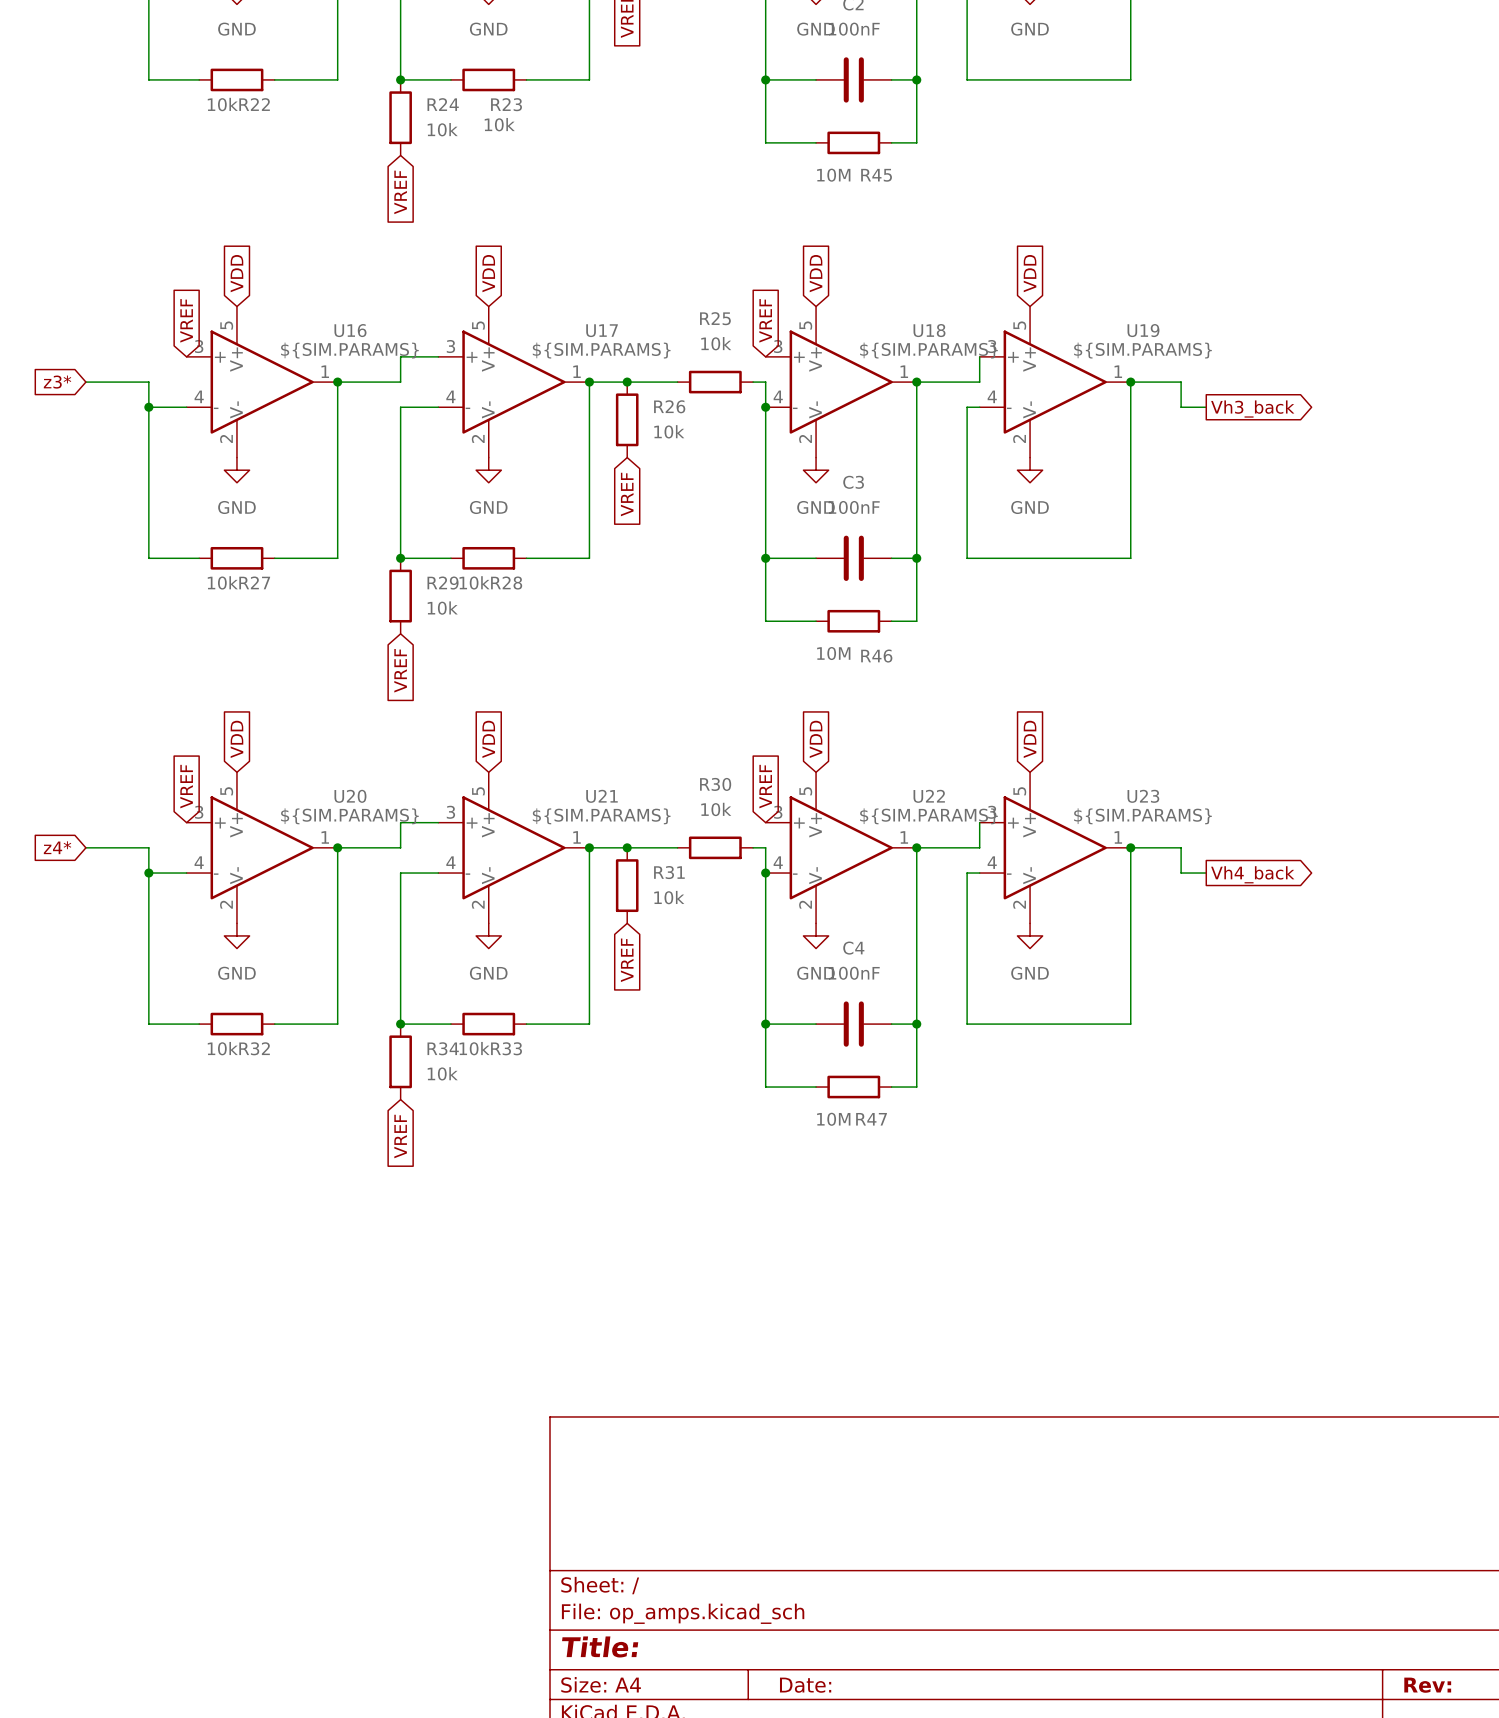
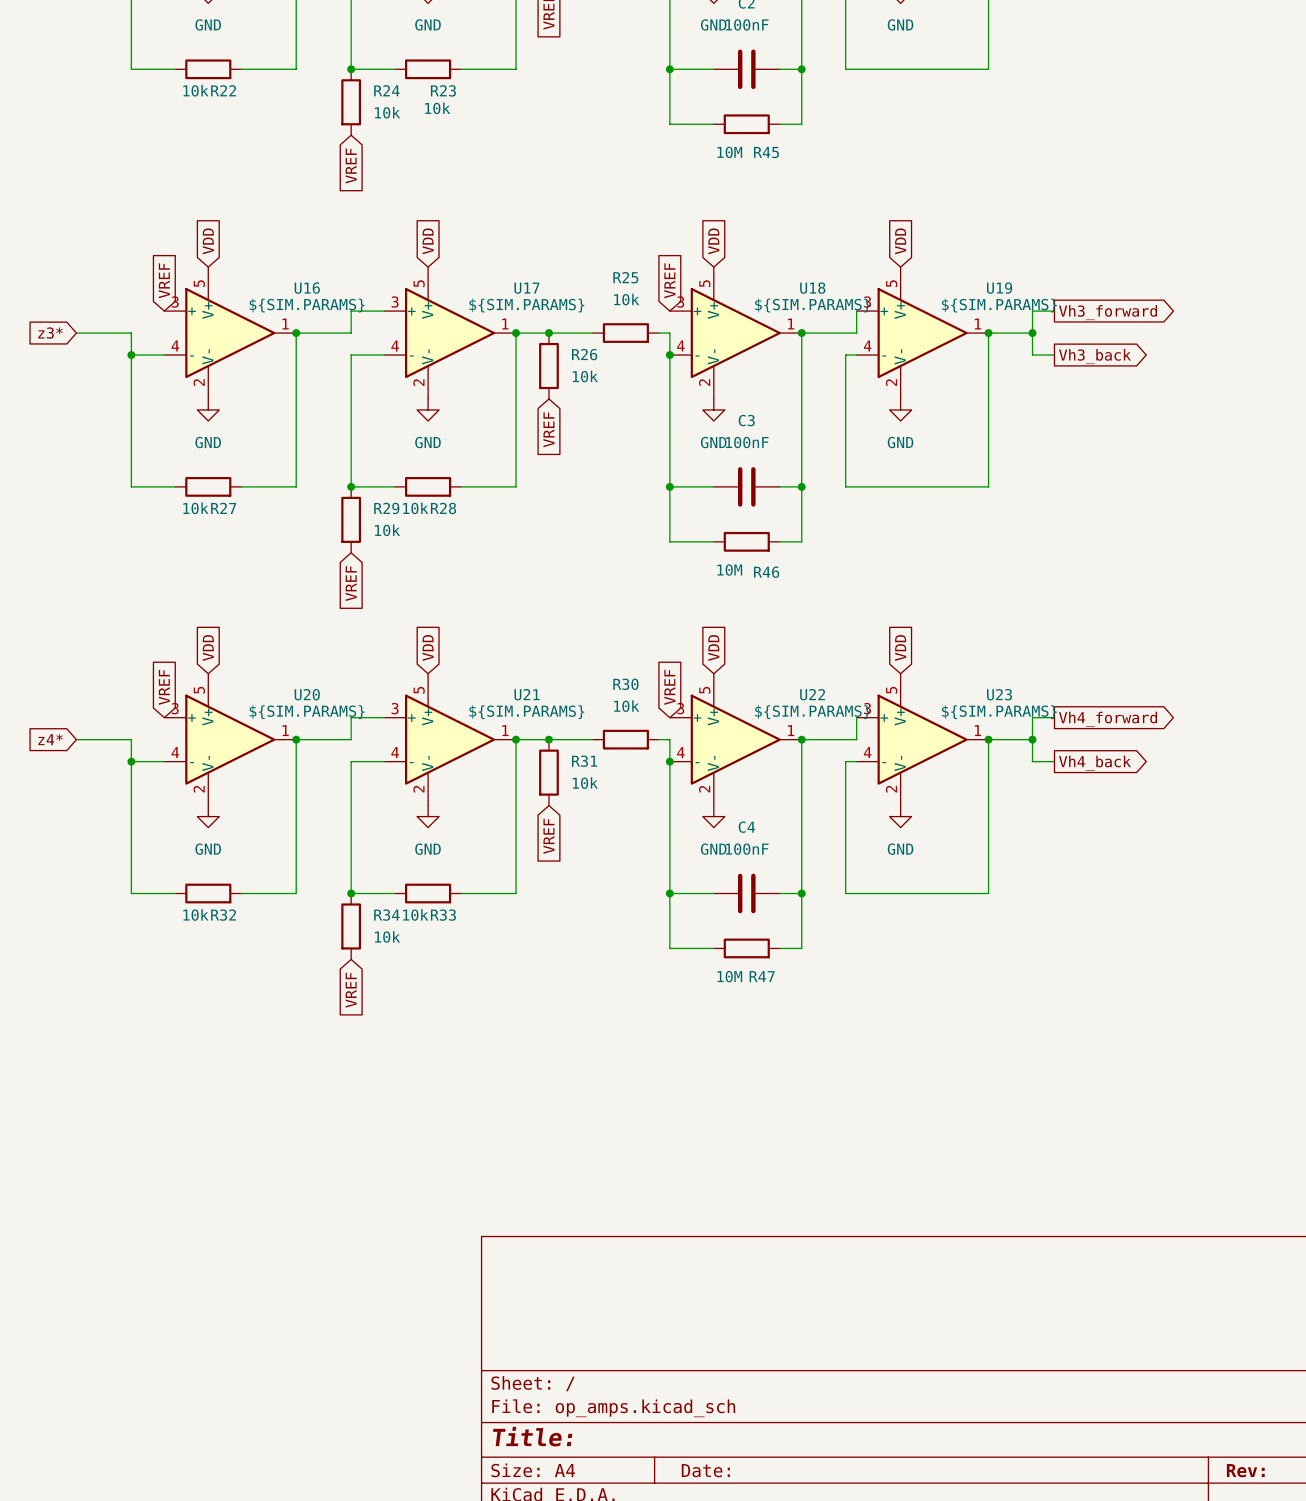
wire: none -> (1054, 311) (1032, 311) (1032, 333)
global label: none -> Vh3_forward (1108, 312)
junction: none -> (1032, 333)
wire: none -> (1054, 717) (1032, 717) (1032, 739)
global label: none -> Vh4_forward (1108, 719)
junction: none -> (1032, 739)

